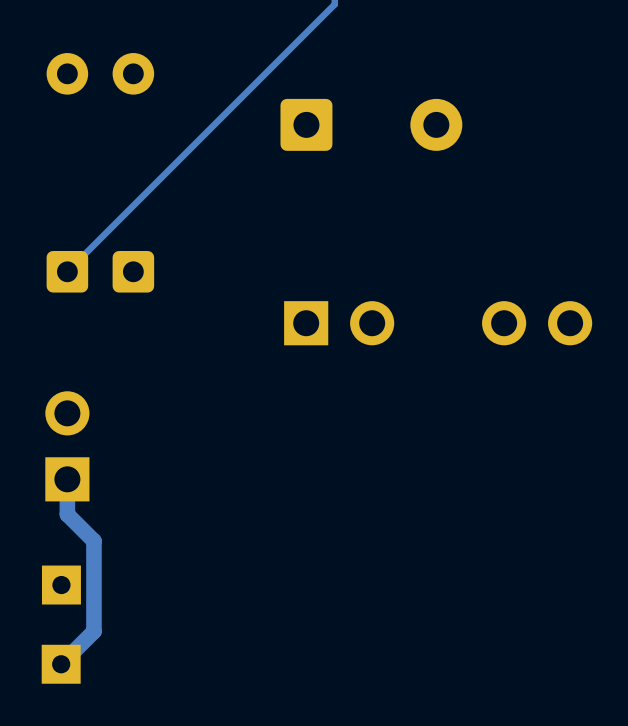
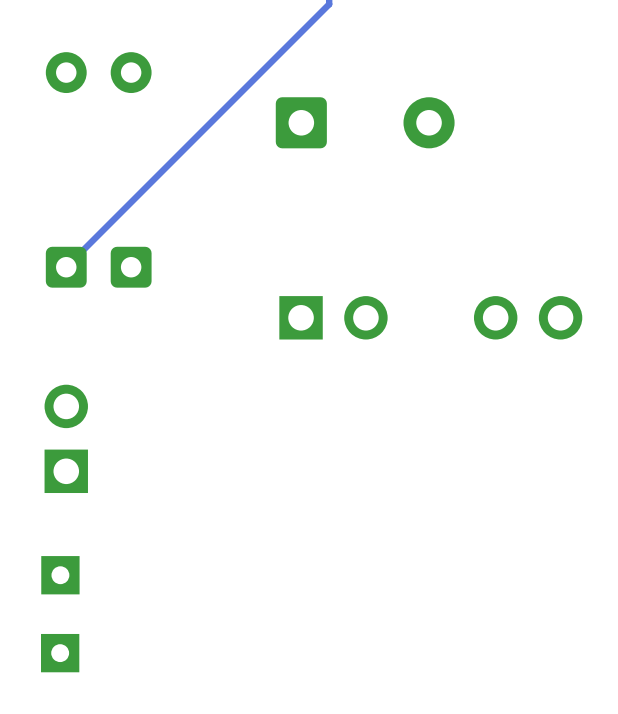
track: (67, 479) (67, 514) (93, 541) (93, 631) (61, 664) -> none

